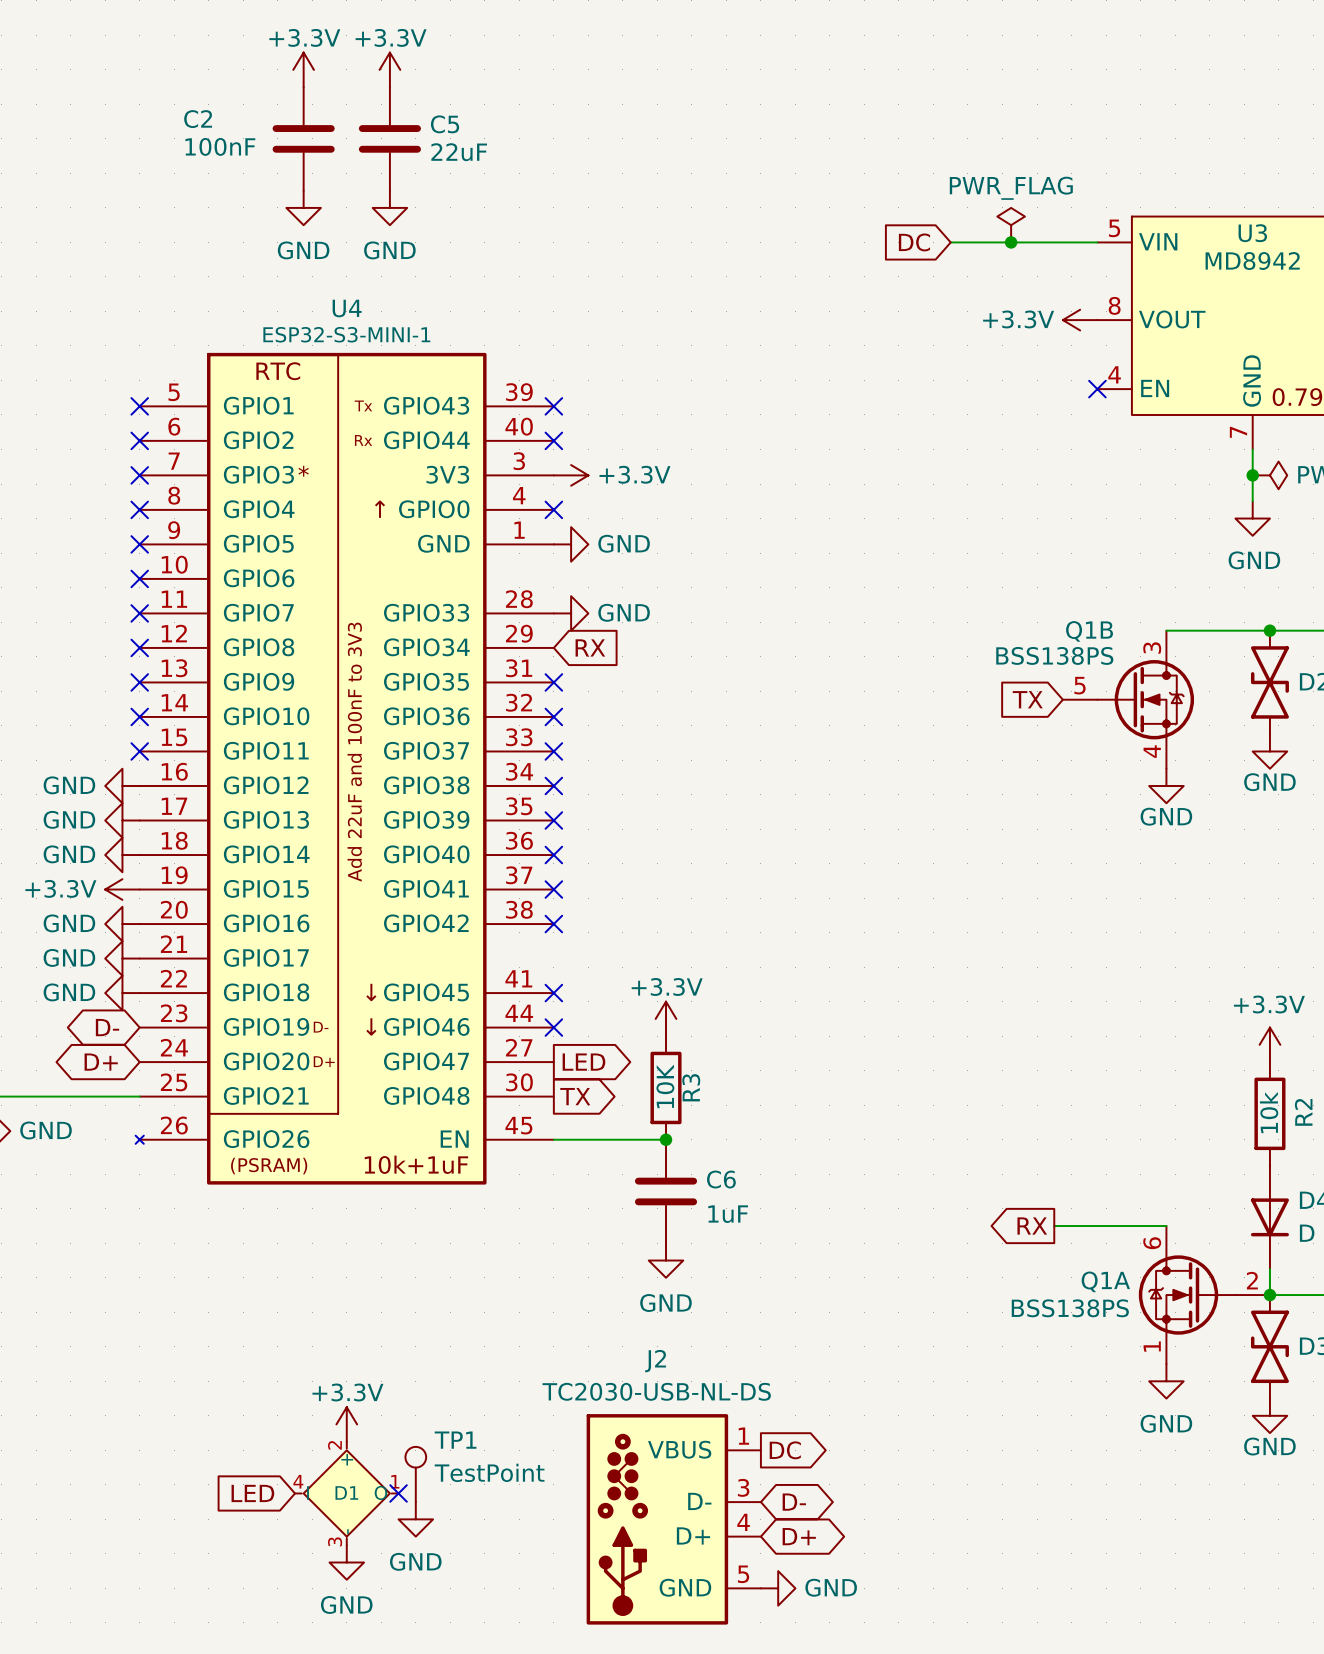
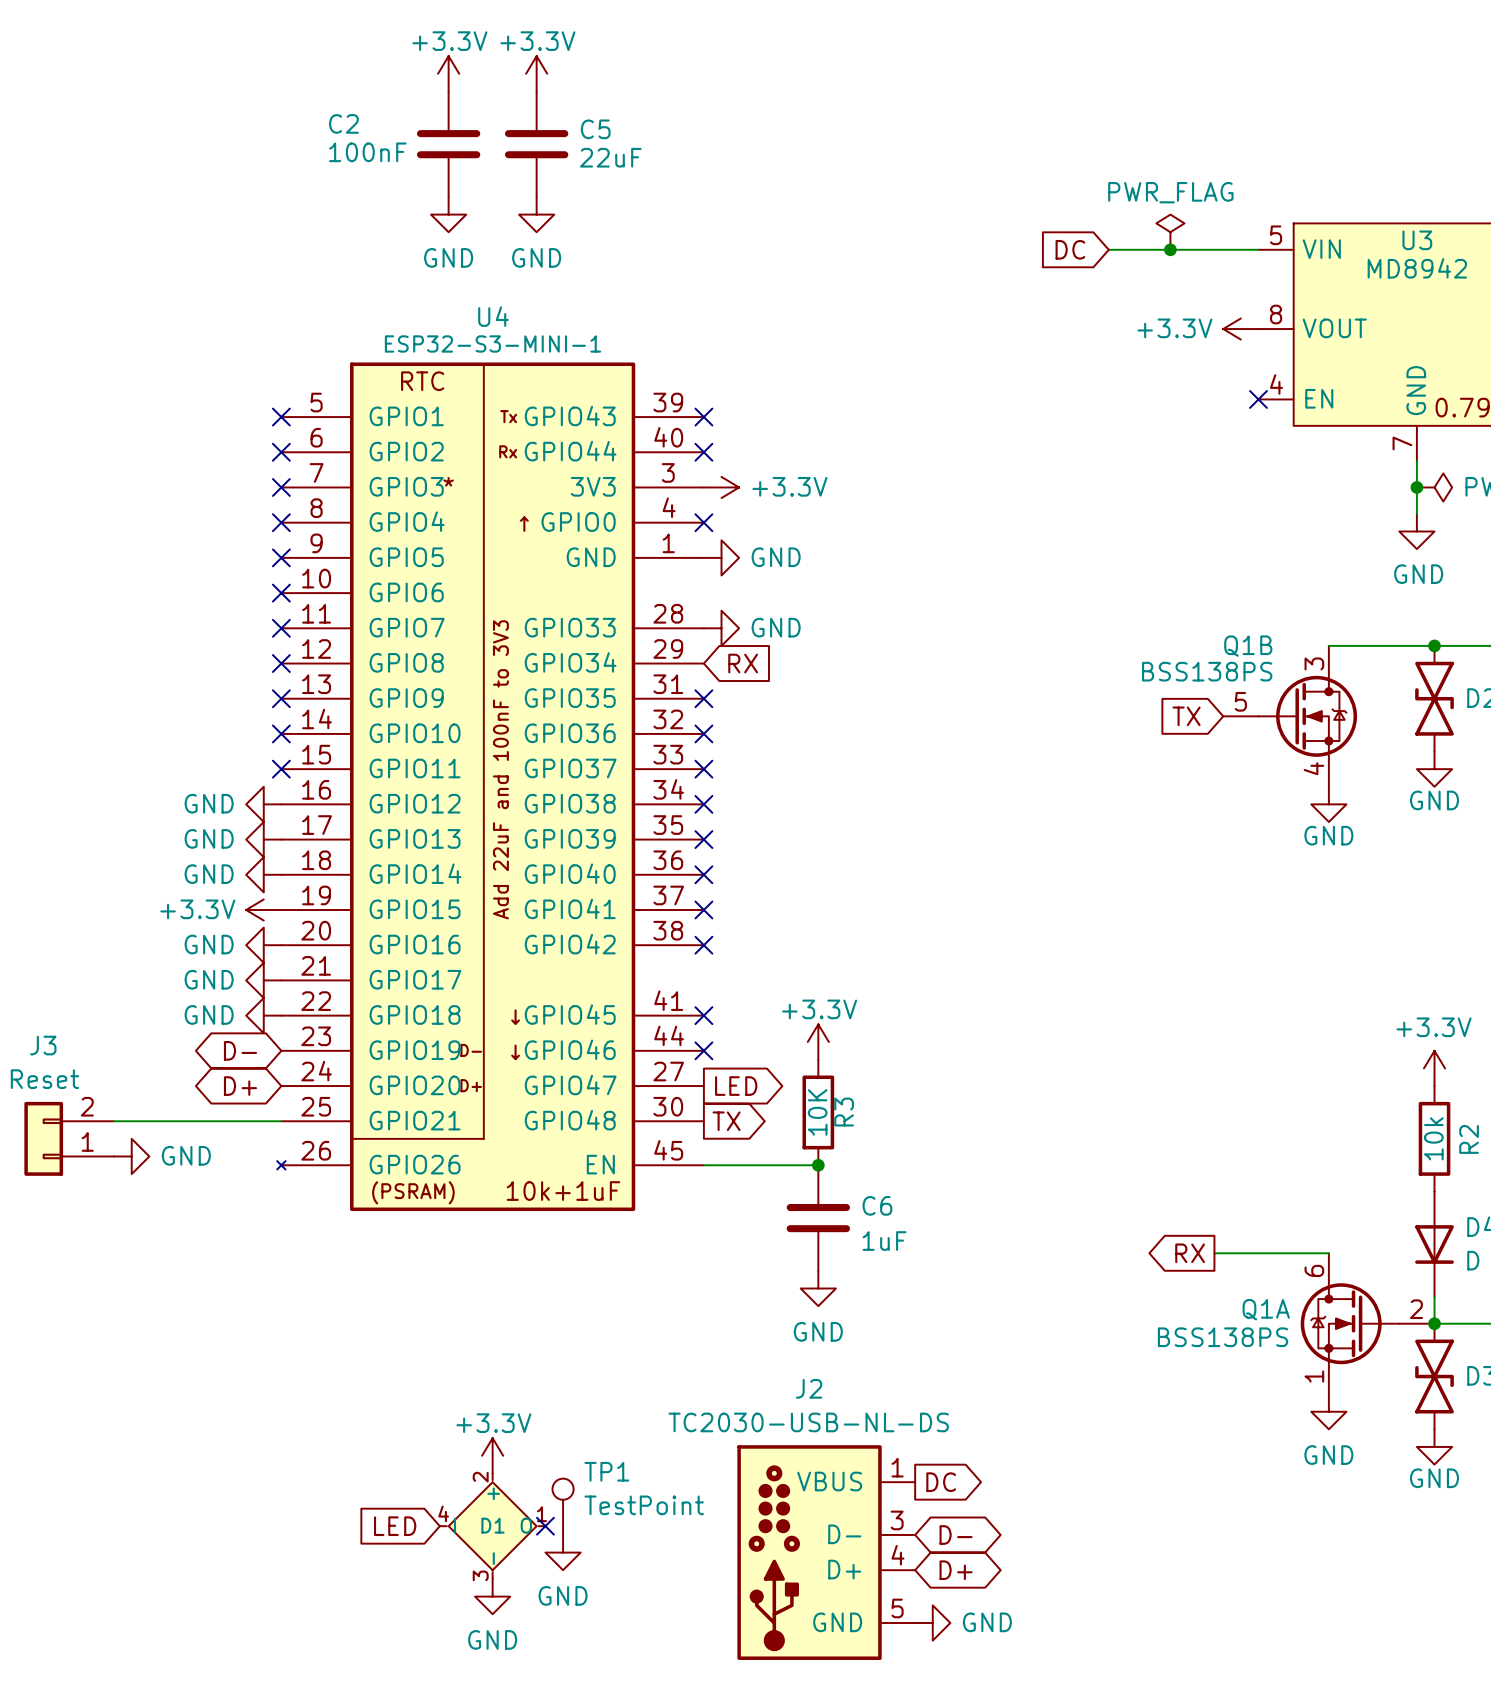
J2 symbol: [586, 1414, 761, 1625] -> [737, 1445, 916, 1660]

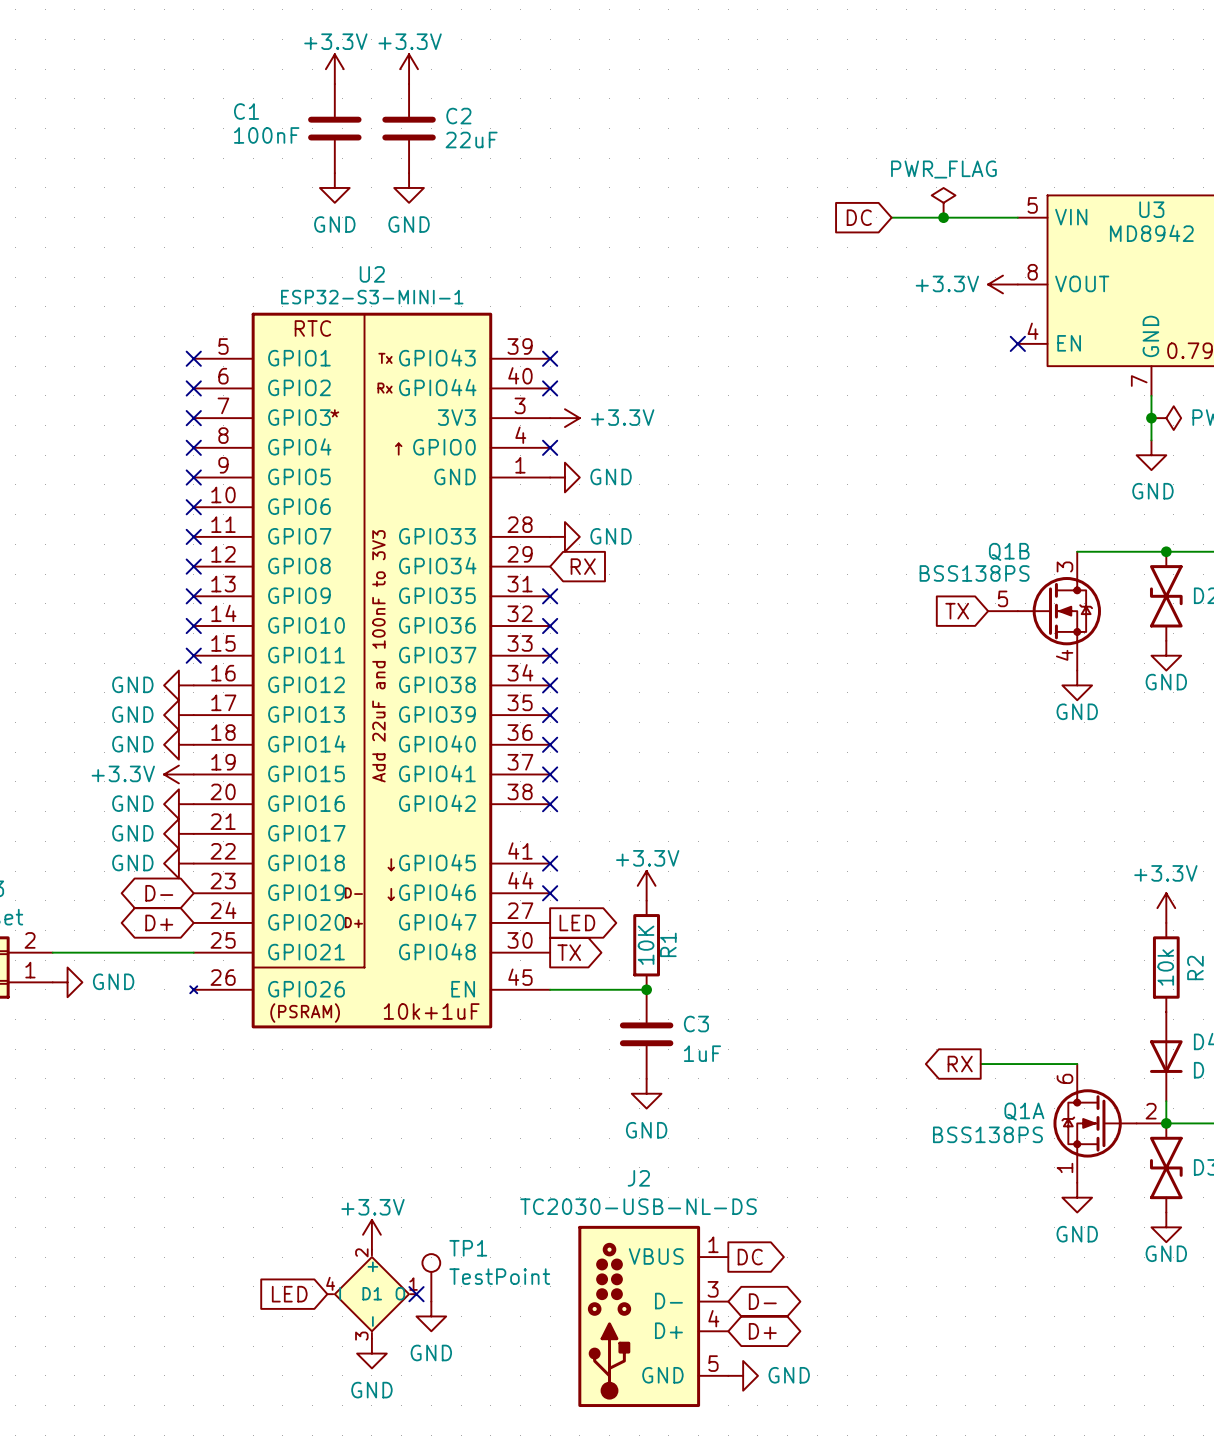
C2 name: C2 (343, 123) -> C1 (246, 111)
C5 name: C5 (595, 129) -> C2 (458, 116)
U4 name: U4 (493, 316) -> U2 (372, 274)
R3 name: R3 (844, 1112) -> R1 (668, 944)
C6 name: C6 (877, 1205) -> C3 (696, 1024)

